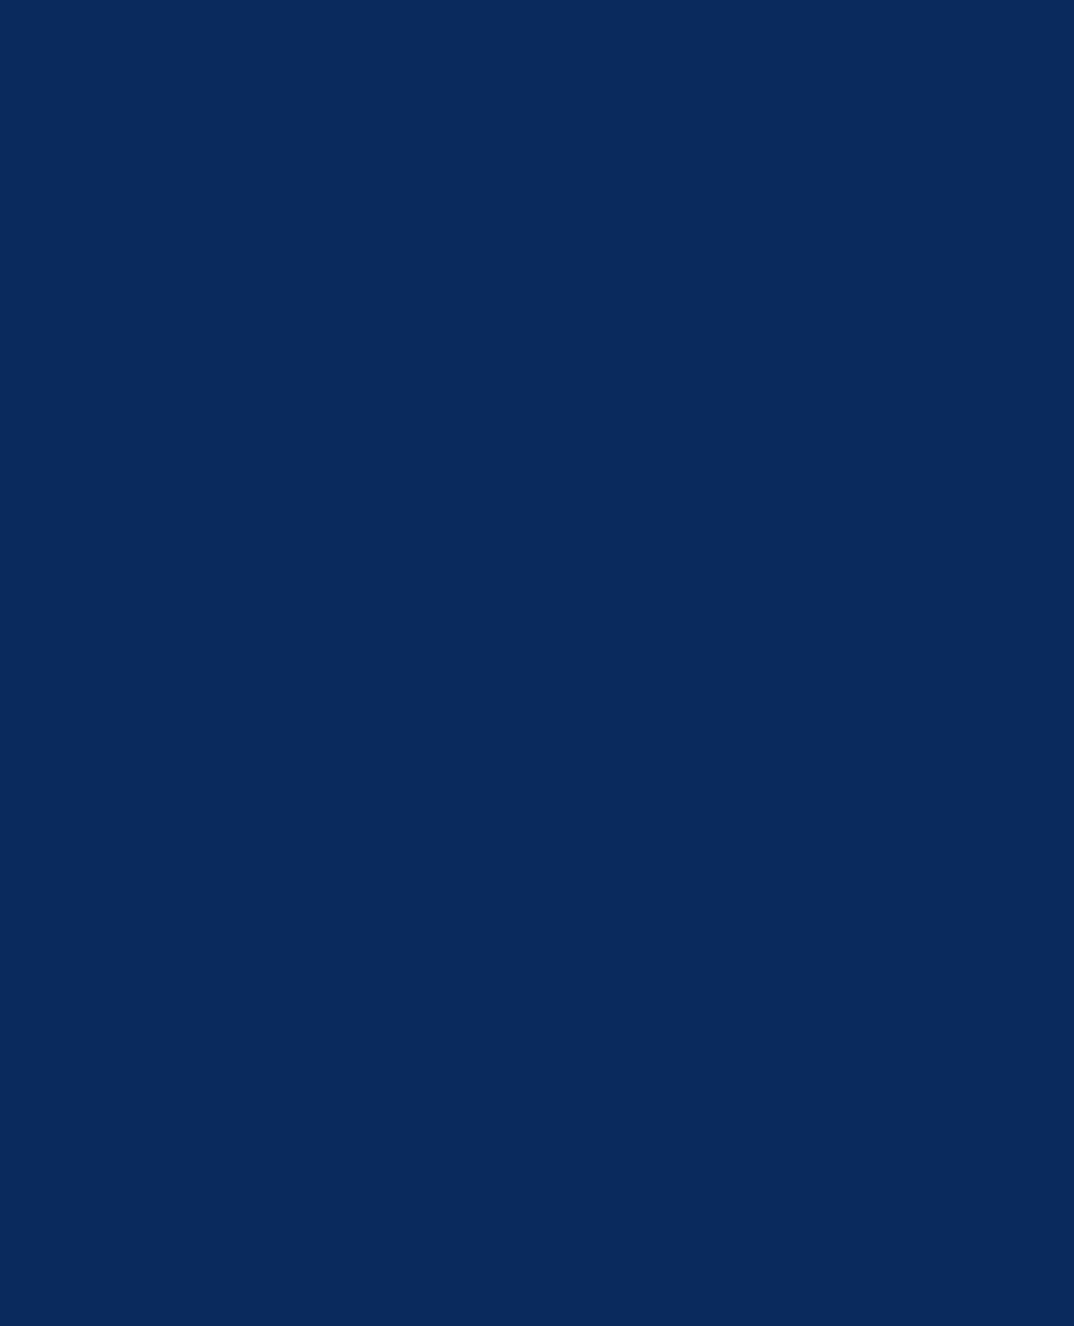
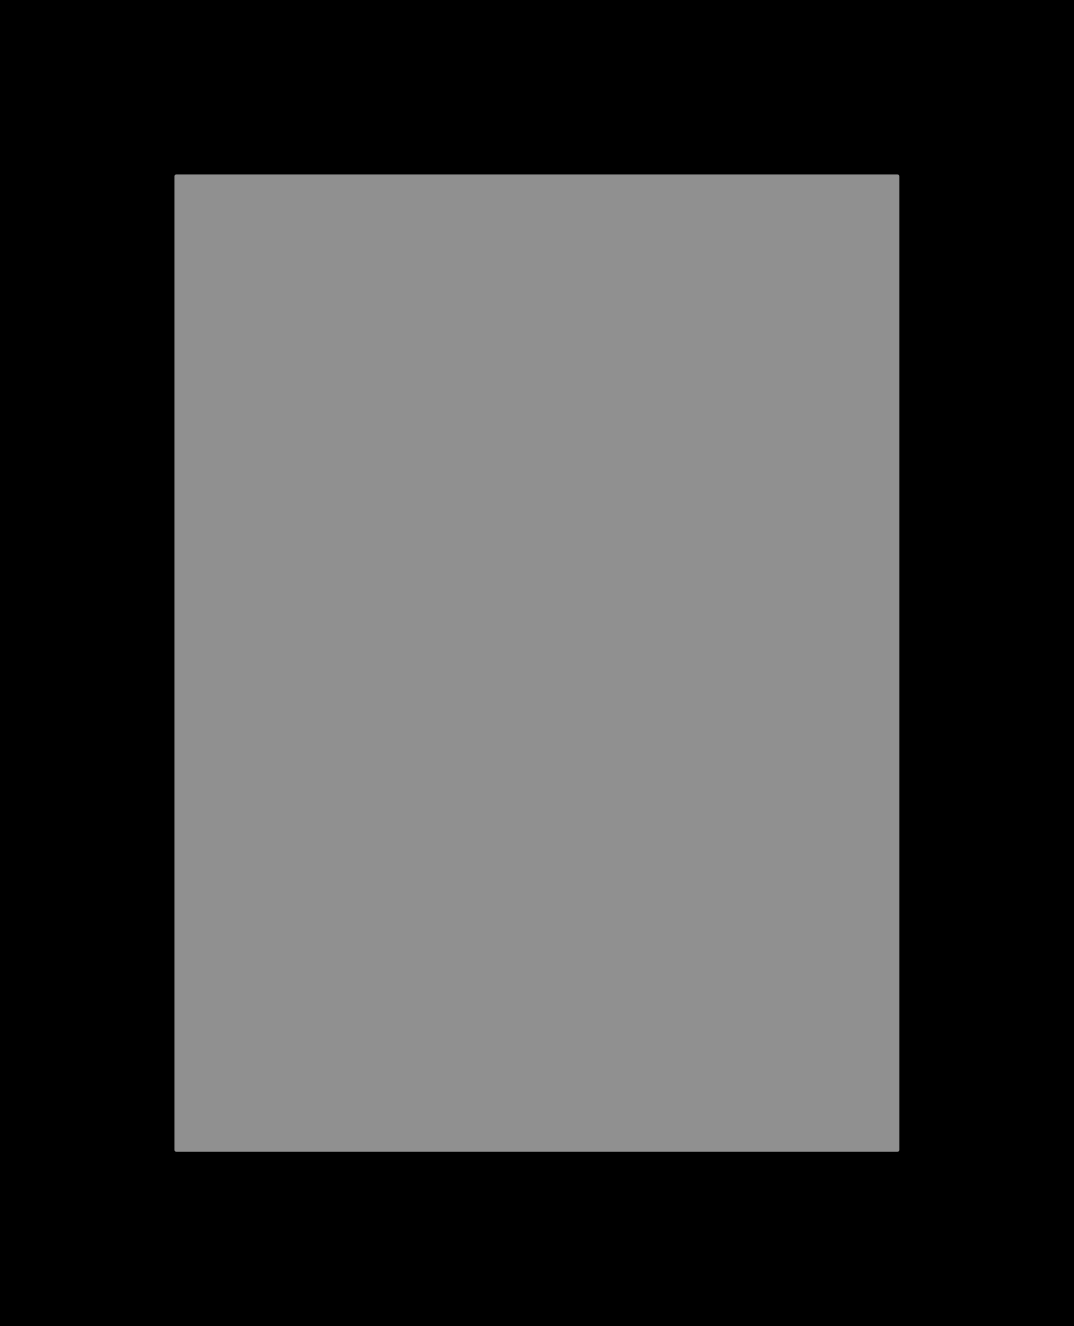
drawing: none -> [174, 174, 900, 1152]

